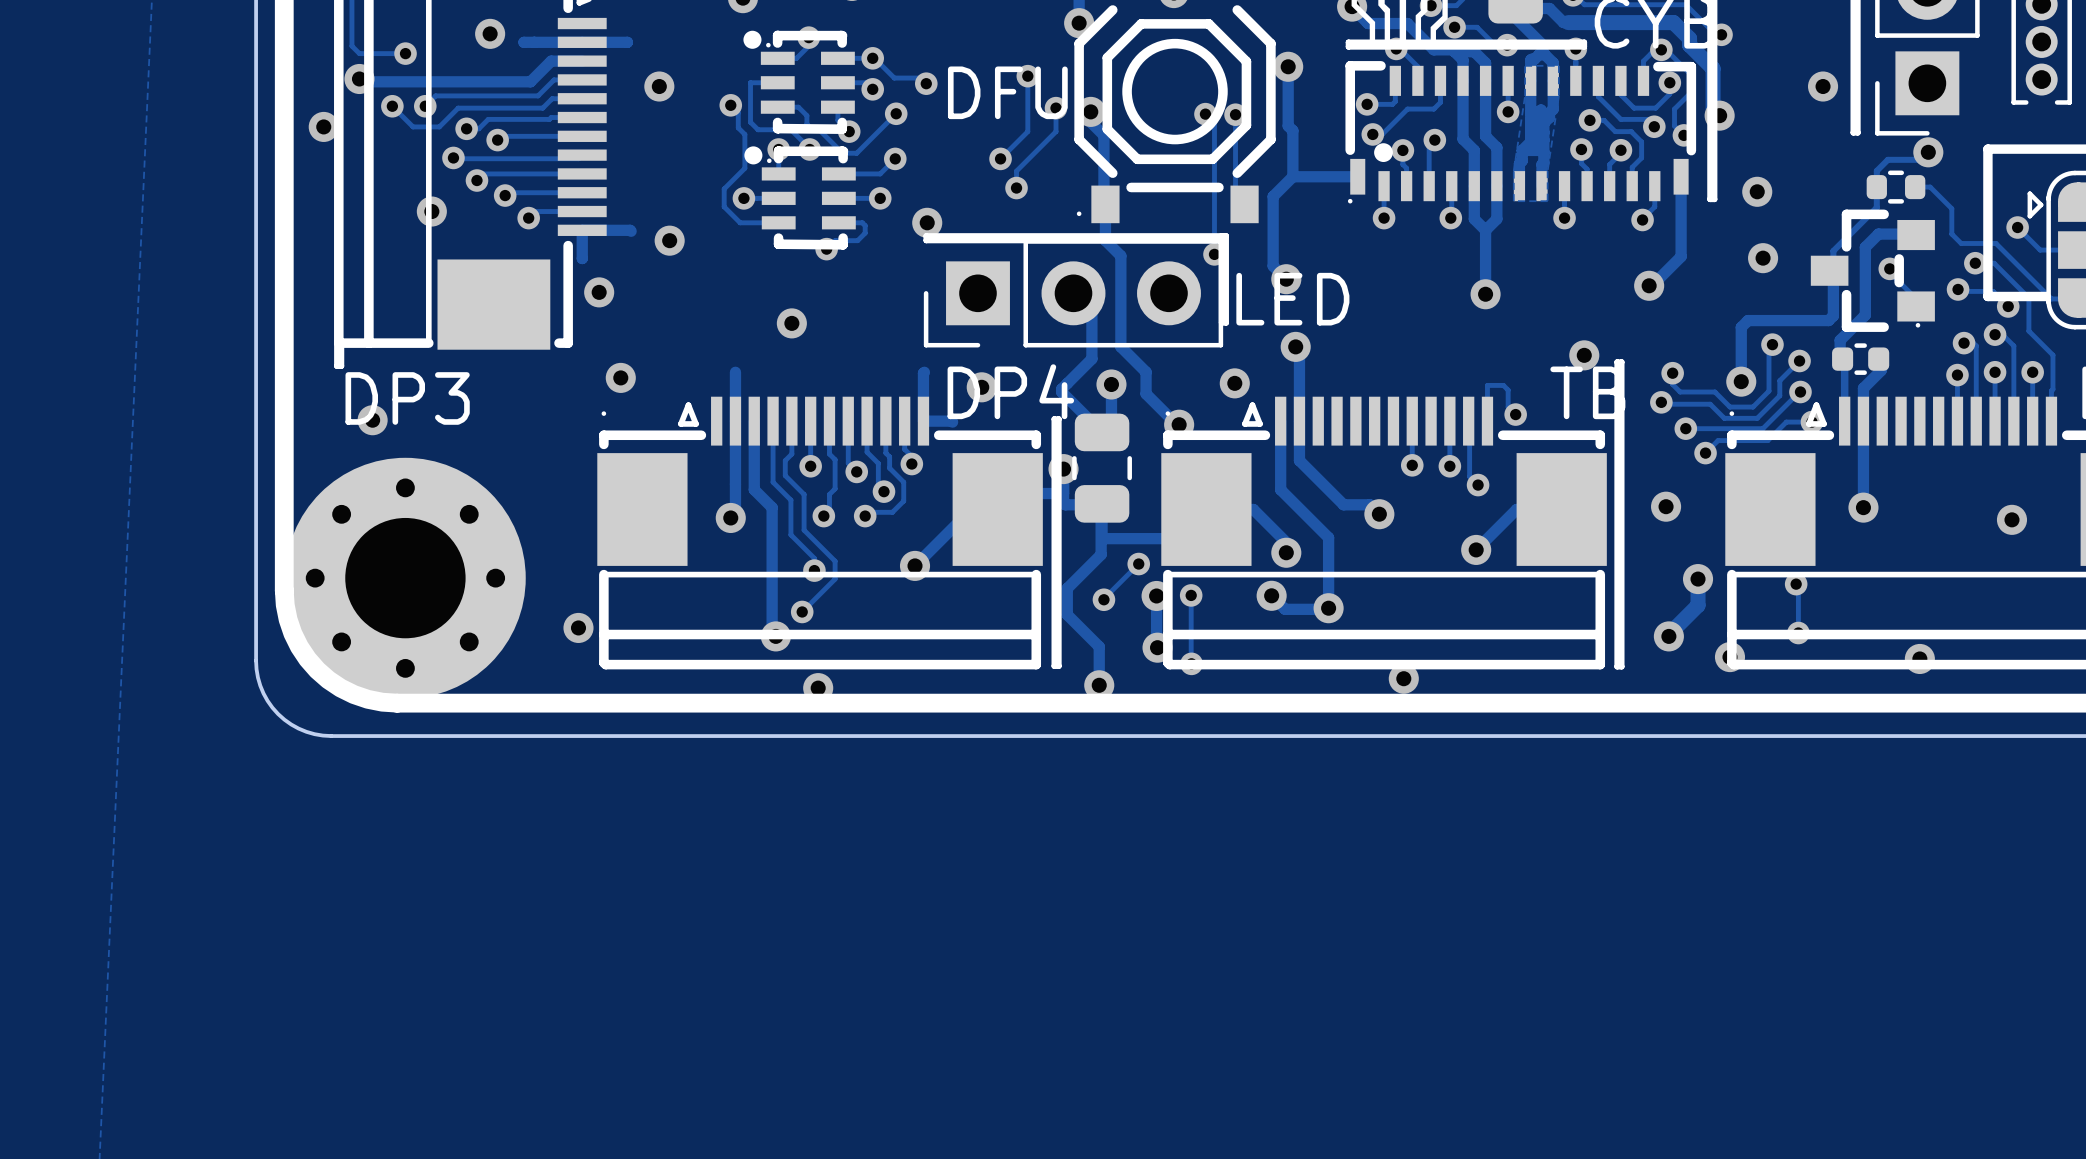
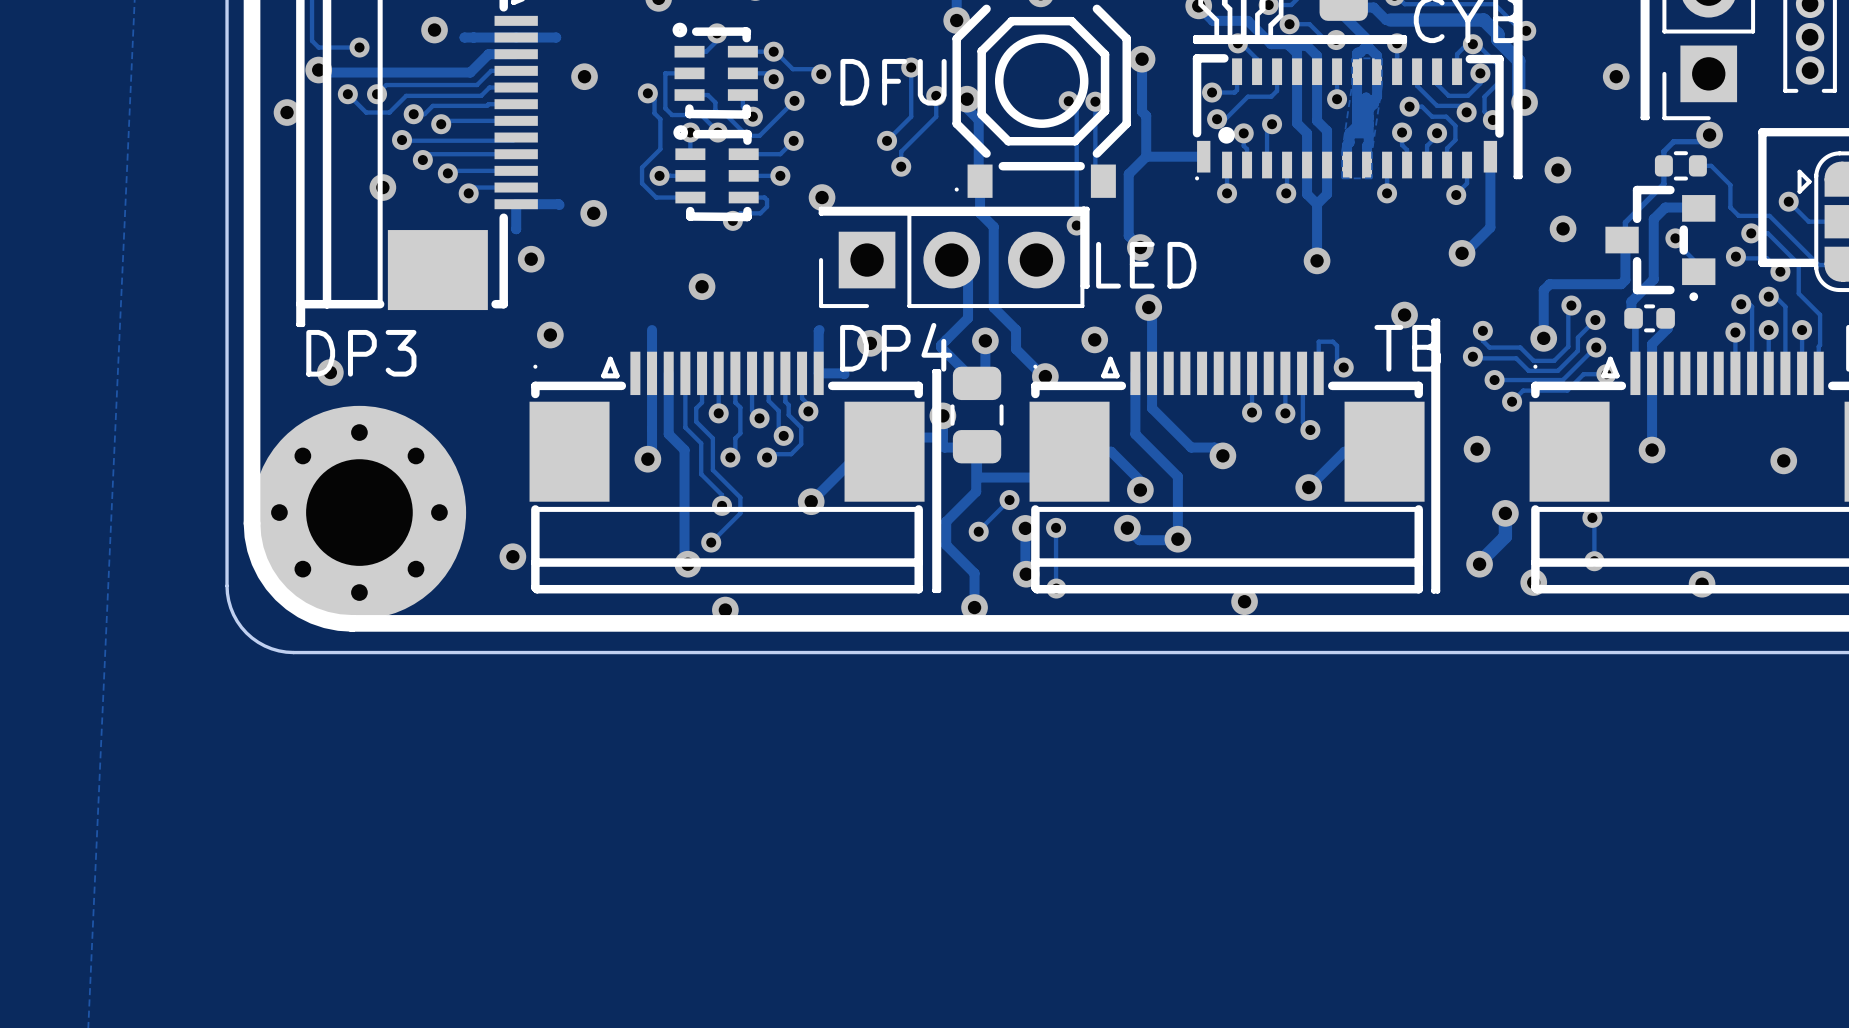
part footprint: [743, 30, 855, 134] -> [672, 22, 758, 119]
part footprint: [744, 146, 856, 250] -> [673, 125, 759, 222]
part footprint: [1810, 209, 1935, 332] -> [1605, 185, 1716, 302]

